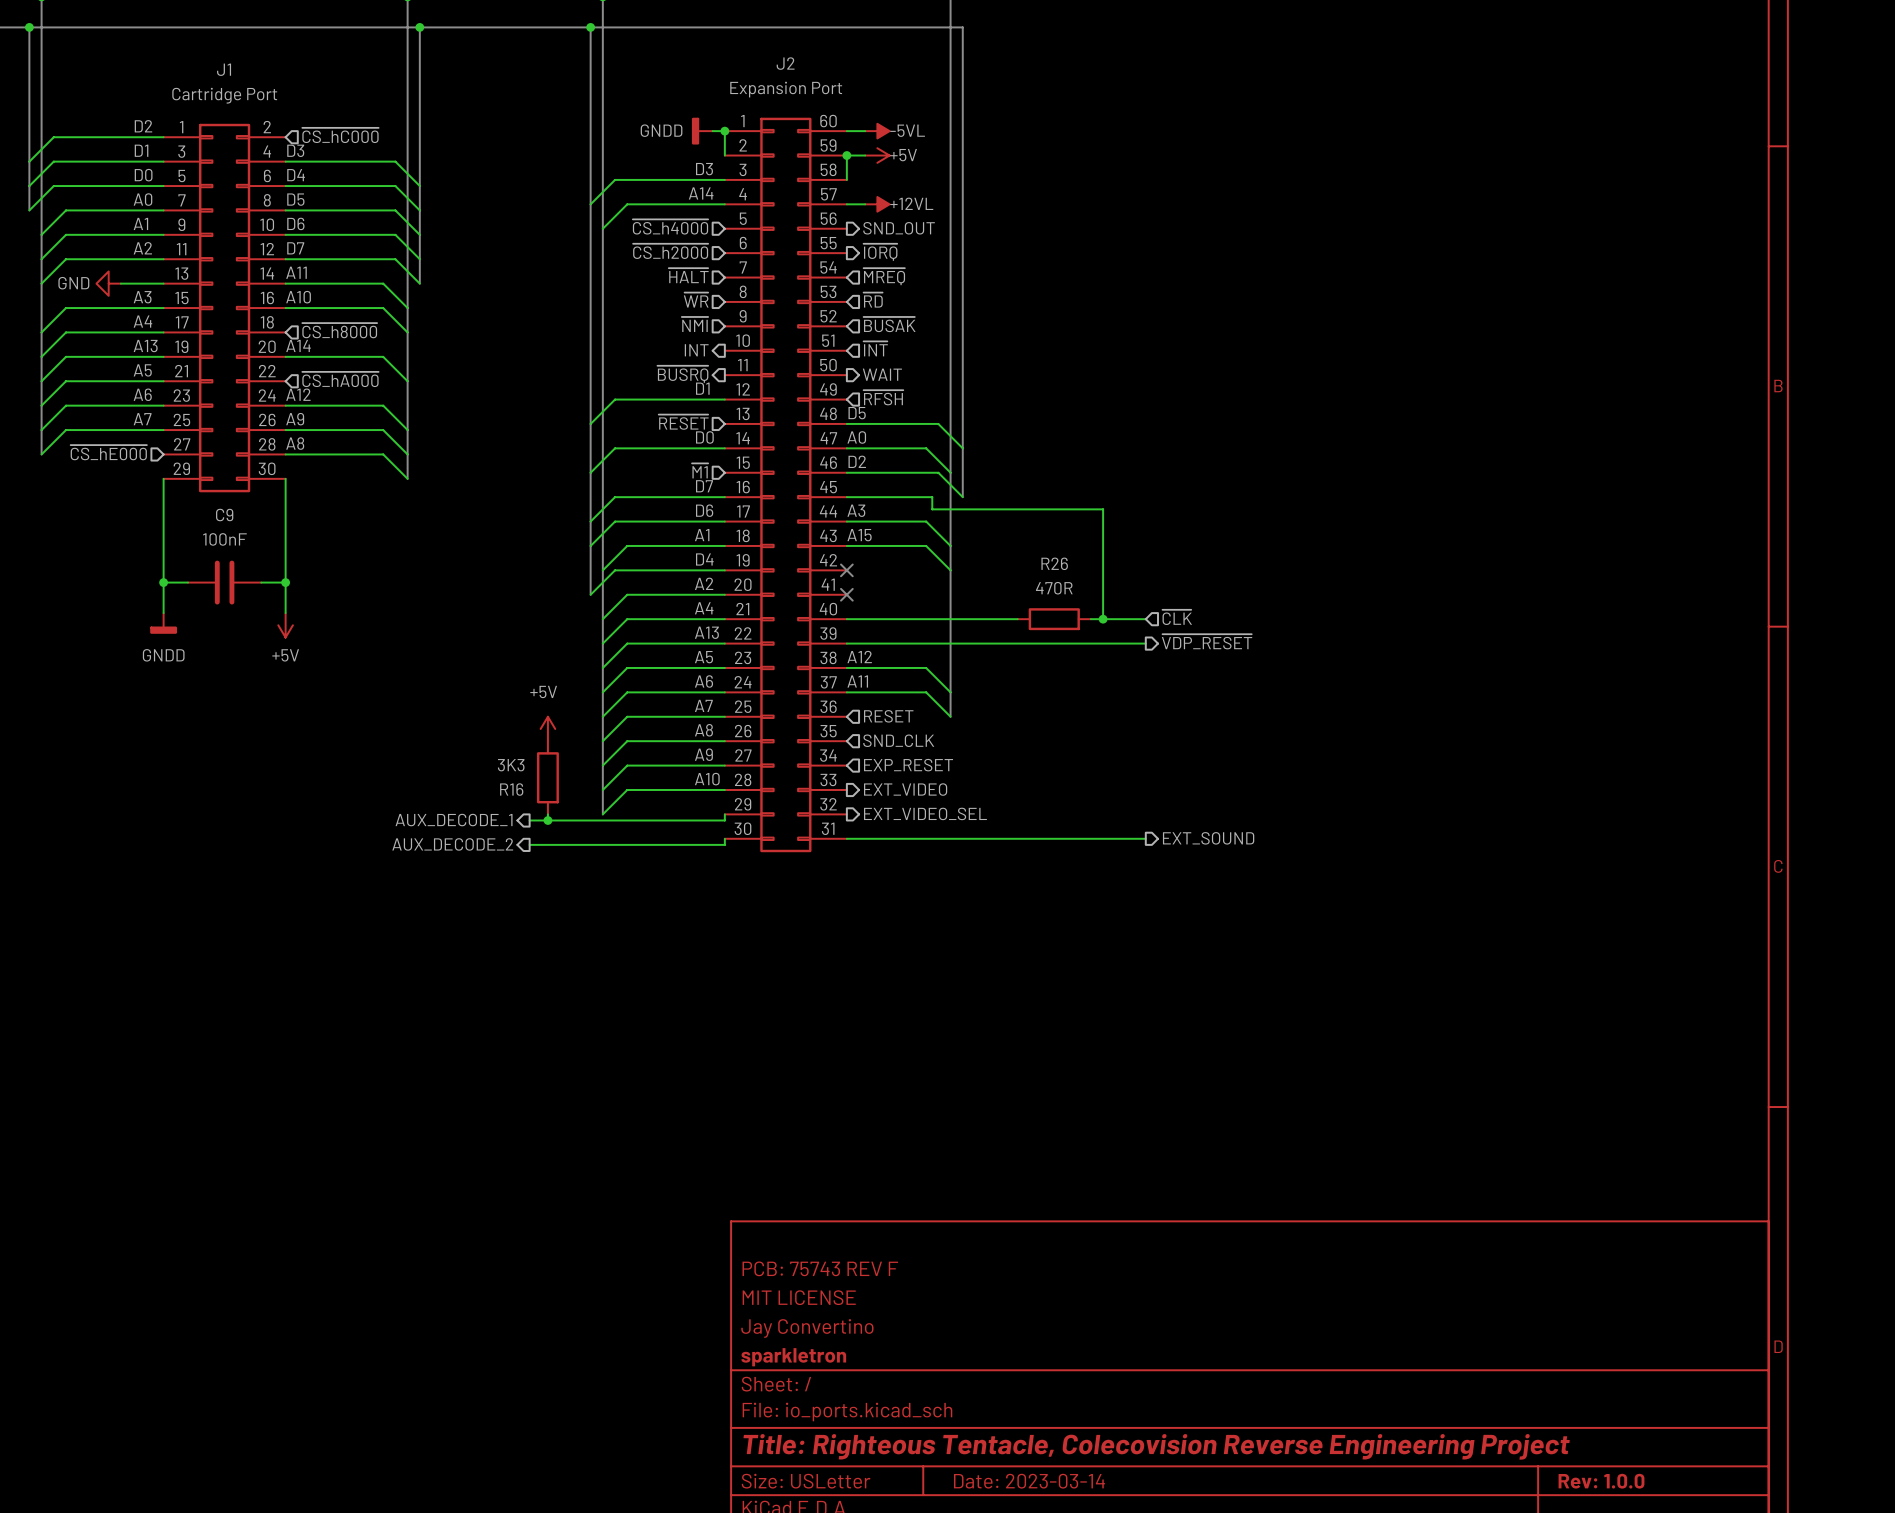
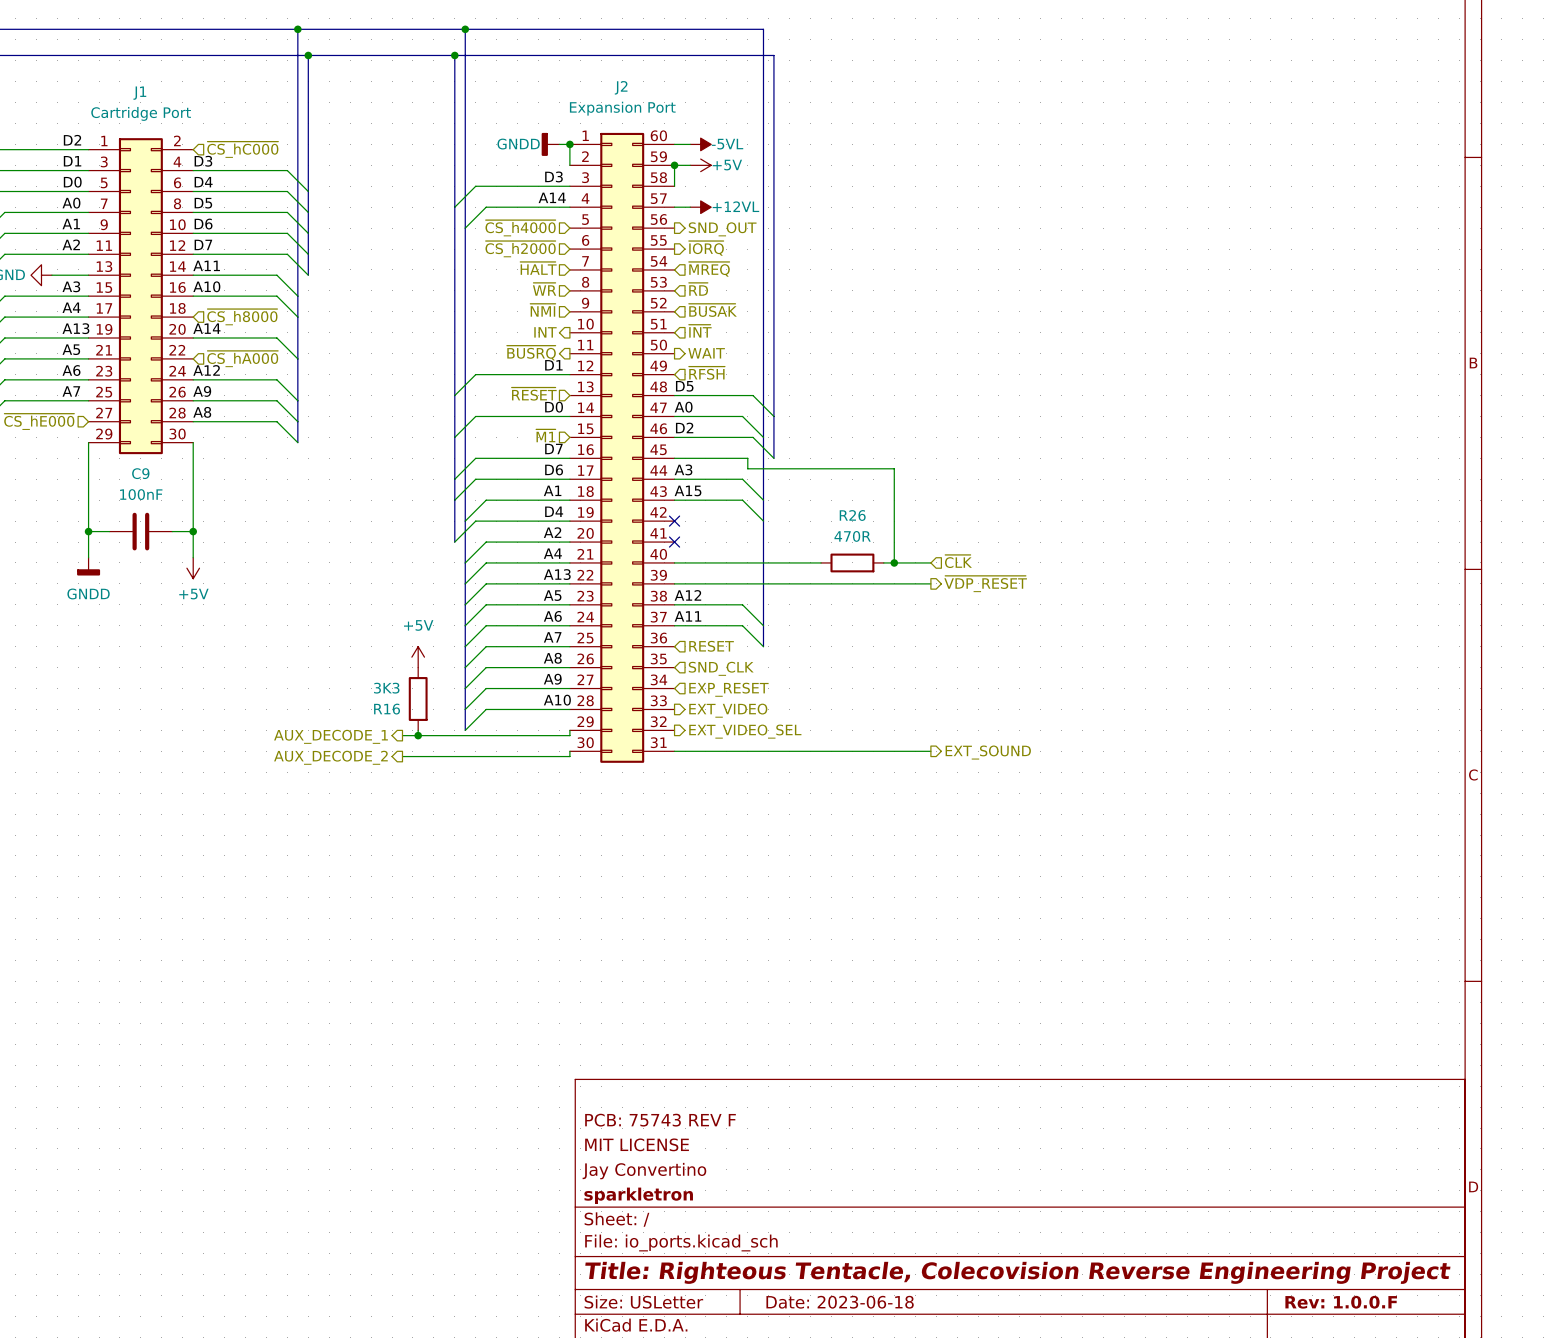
title block: Date: 2023-03-14 (1029, 1481) -> Date: 2023-06-18 (840, 1302)
title block: Rev: 1.0.0 (1601, 1481) -> Rev: 1.0.0.F (1341, 1302)

